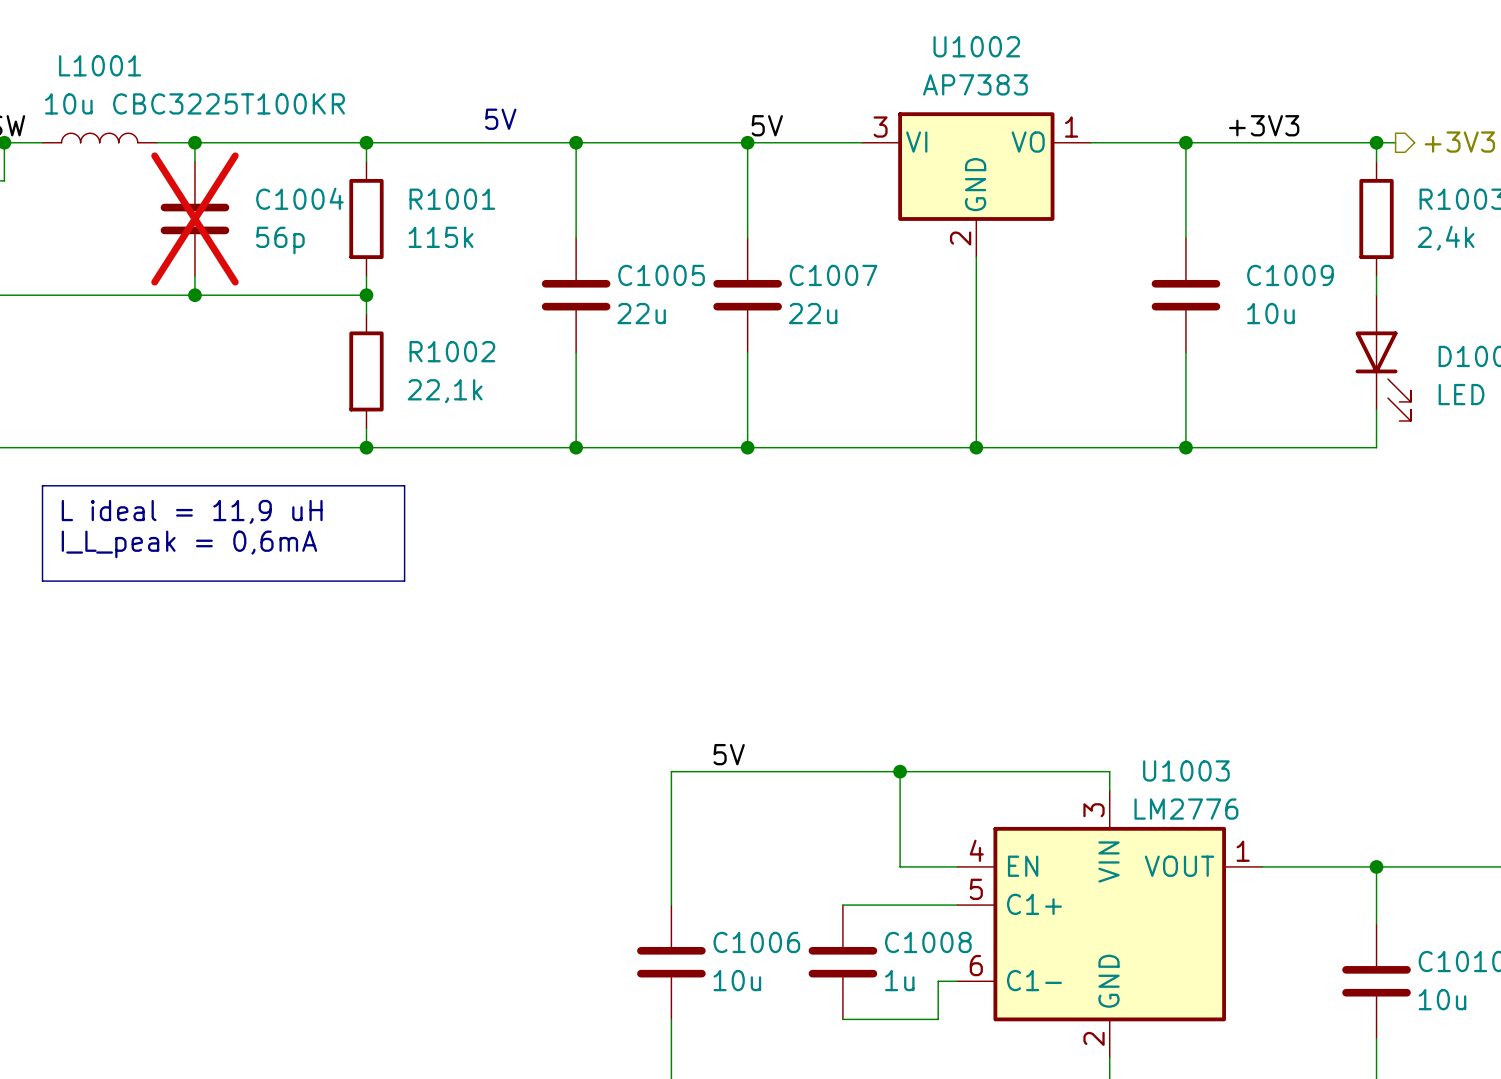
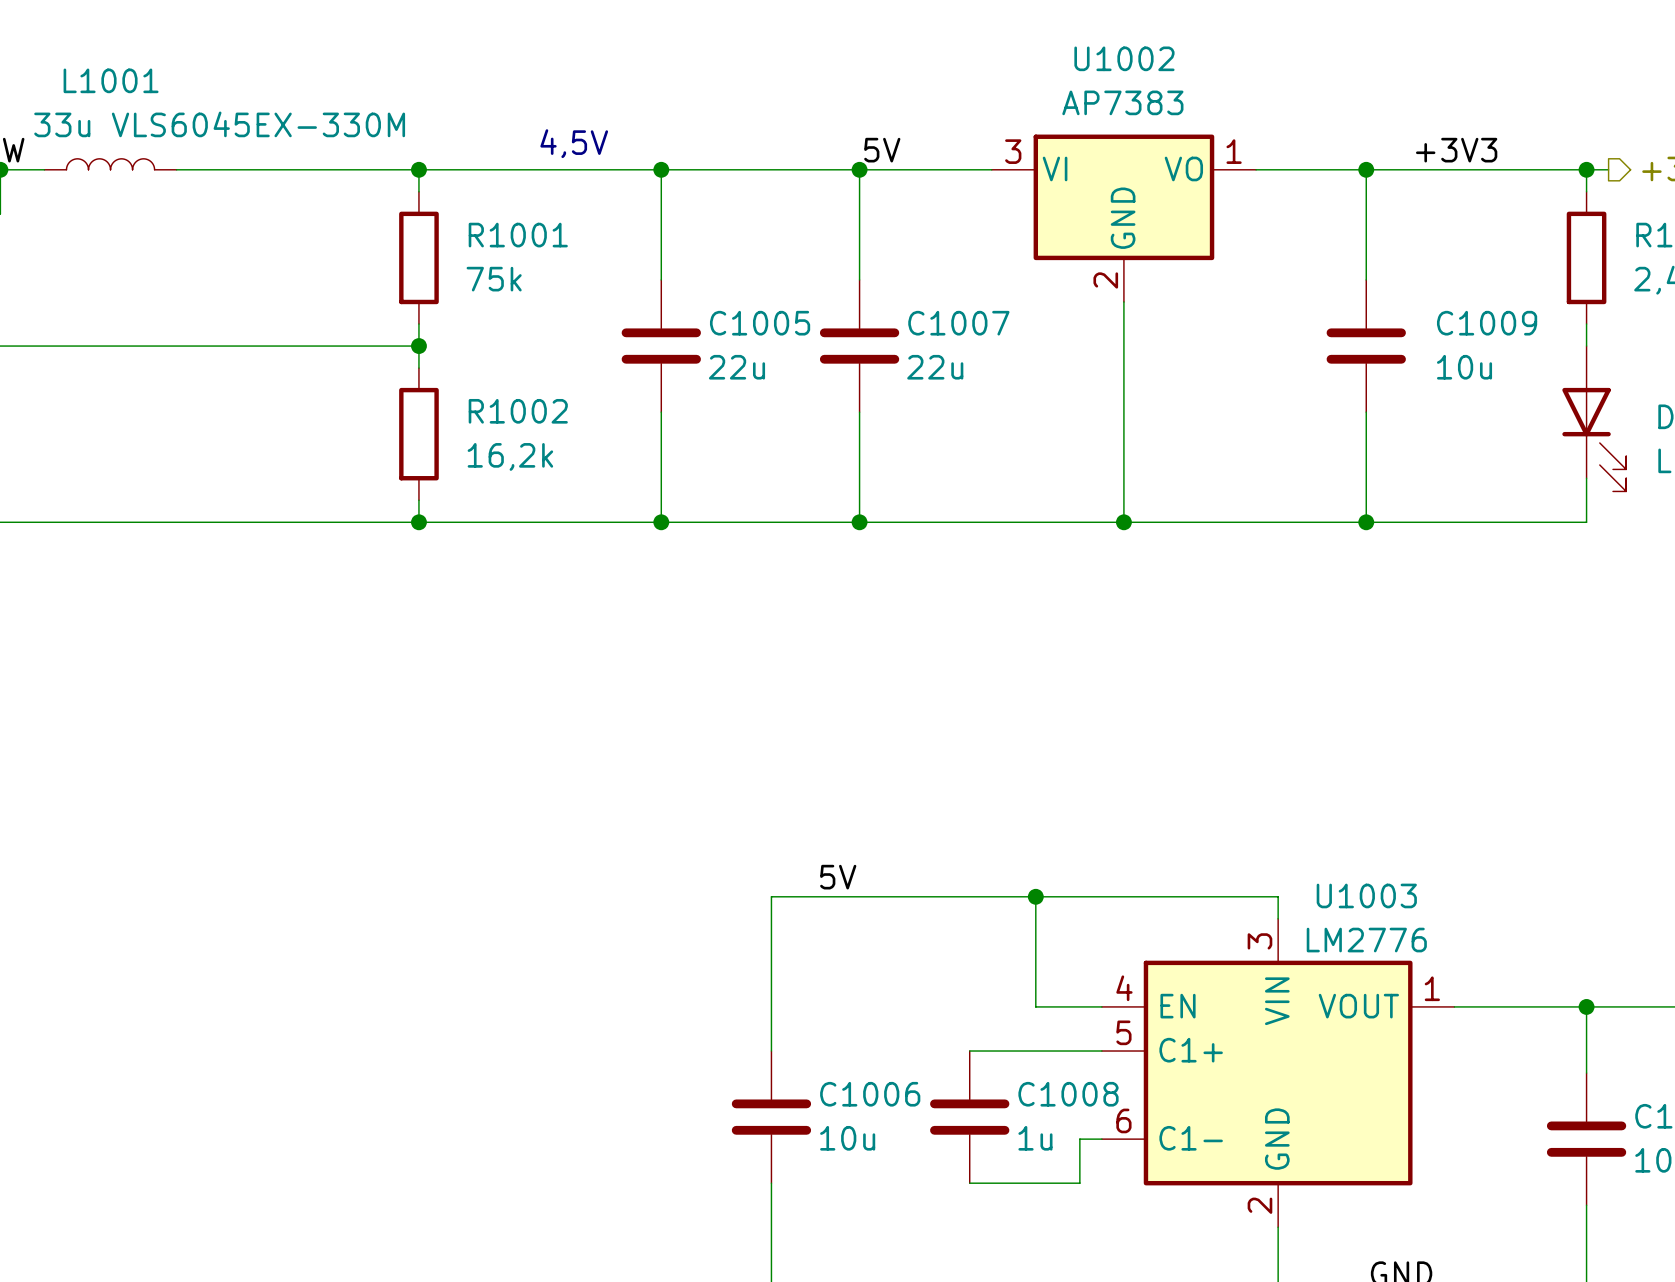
L1001 value: 10u CBC3225T100KR (194, 103) -> 33u VLS6045EX-330M (219, 124)
text: 5V (500, 119) -> 4,5V (574, 143)
wire: (194, 142) (194, 161) -> none
junction: (194, 142) -> none
C1004: 56p (194, 218) -> none
R1001 value: 115k (441, 237) -> 75k (494, 279)
wire: (194, 276) (194, 295) -> none
junction: (194, 295) -> none
R1002 value: 22,1k (445, 391) -> 16,2k (510, 456)
line: (42, 485) (404, 485) (404, 581) (42, 581) (42, 485) -> none
text: L ideal = 11,9 uH (192, 511) -> none
text: I_L_peak = 0,6mA (189, 544) -> none

